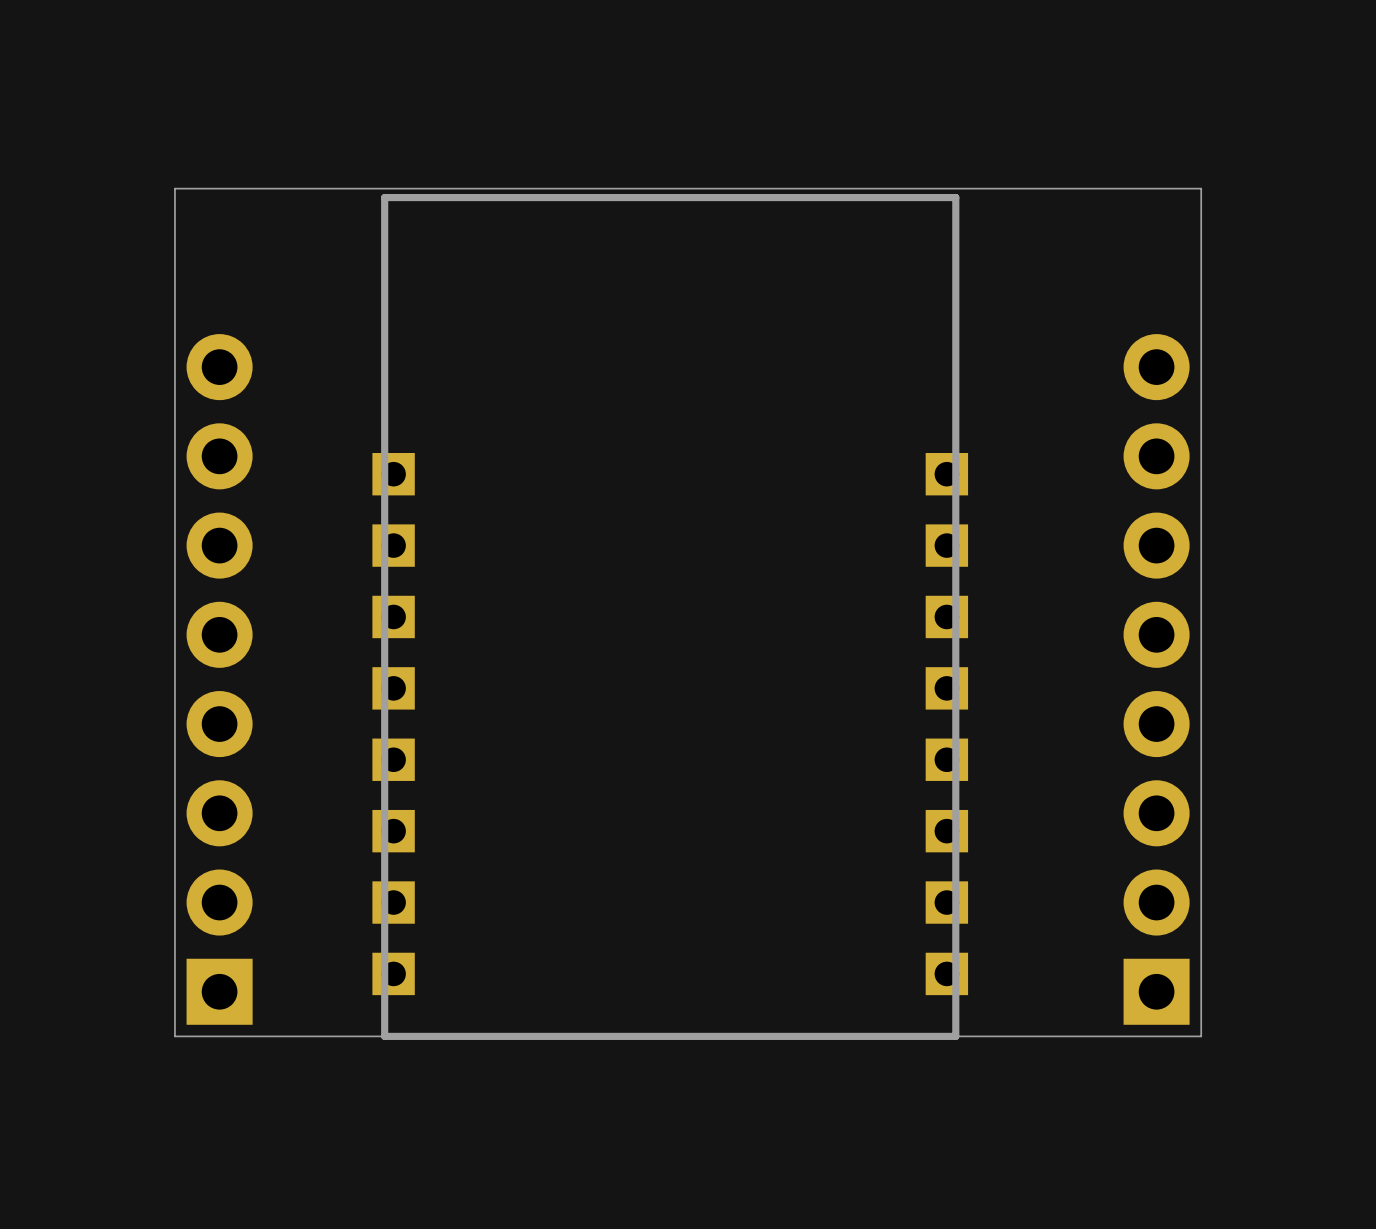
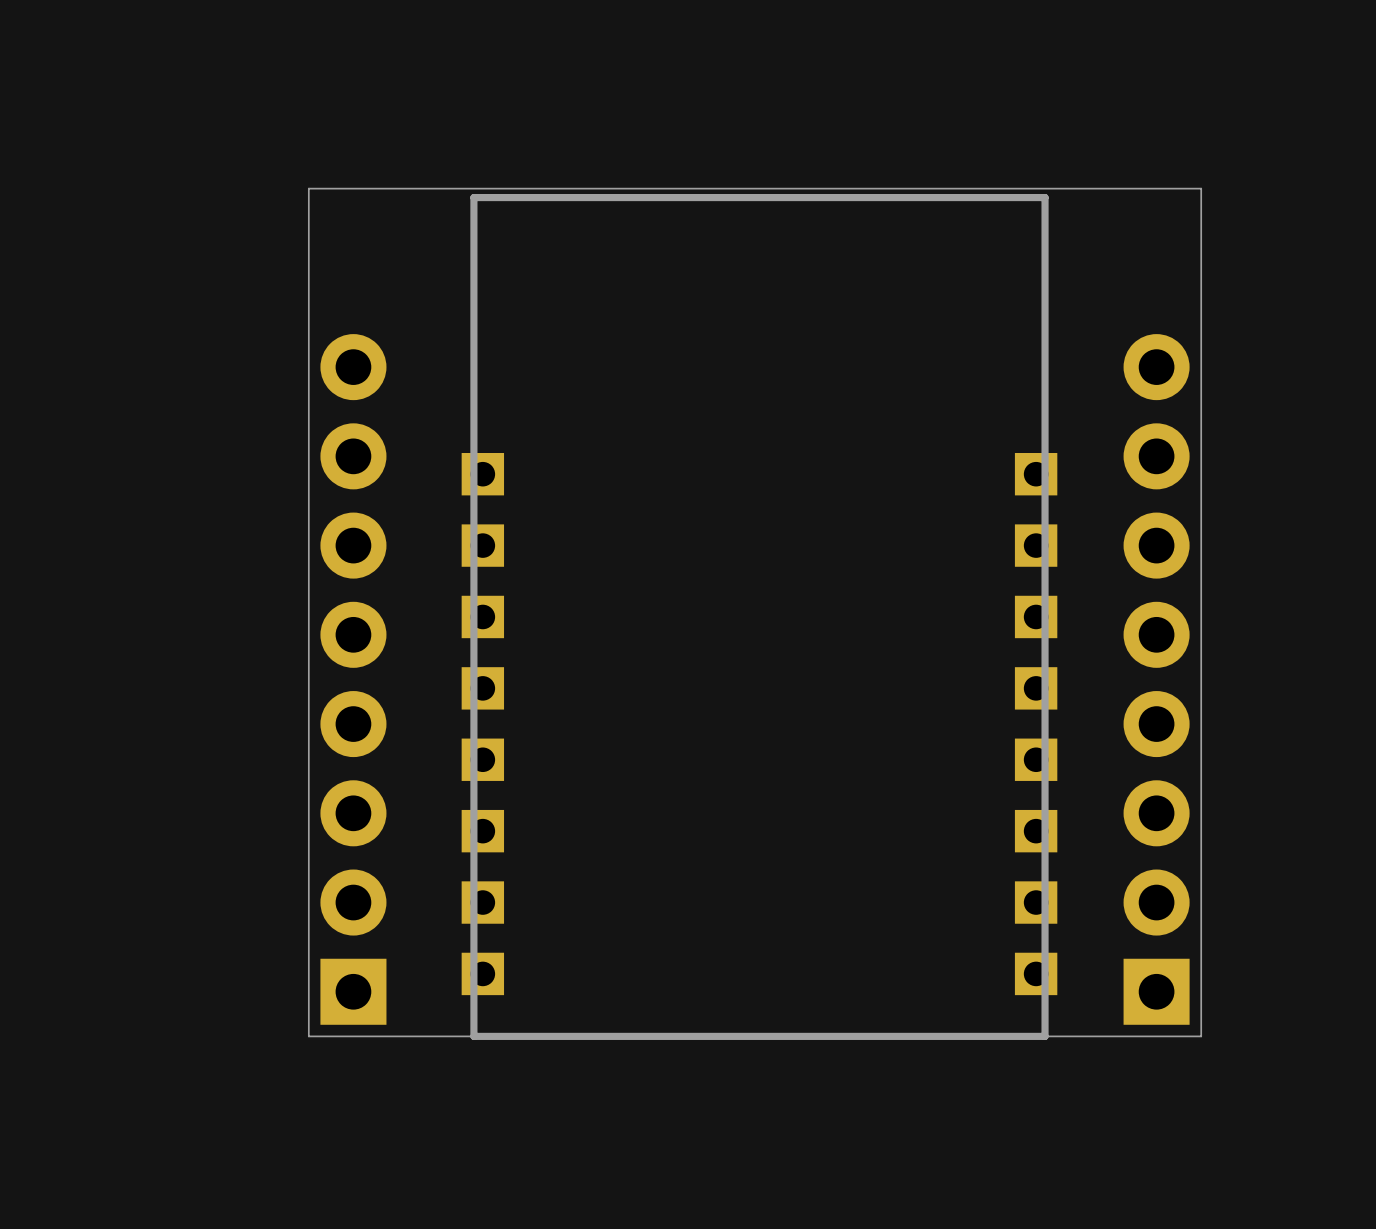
board edge: (308, 188) (174, 188) (174, 1036) (308, 1036) -> (308, 188) (308, 1036)
part position: (670, 616) -> (759, 616)
part position: (219, 679) -> (353, 679)

